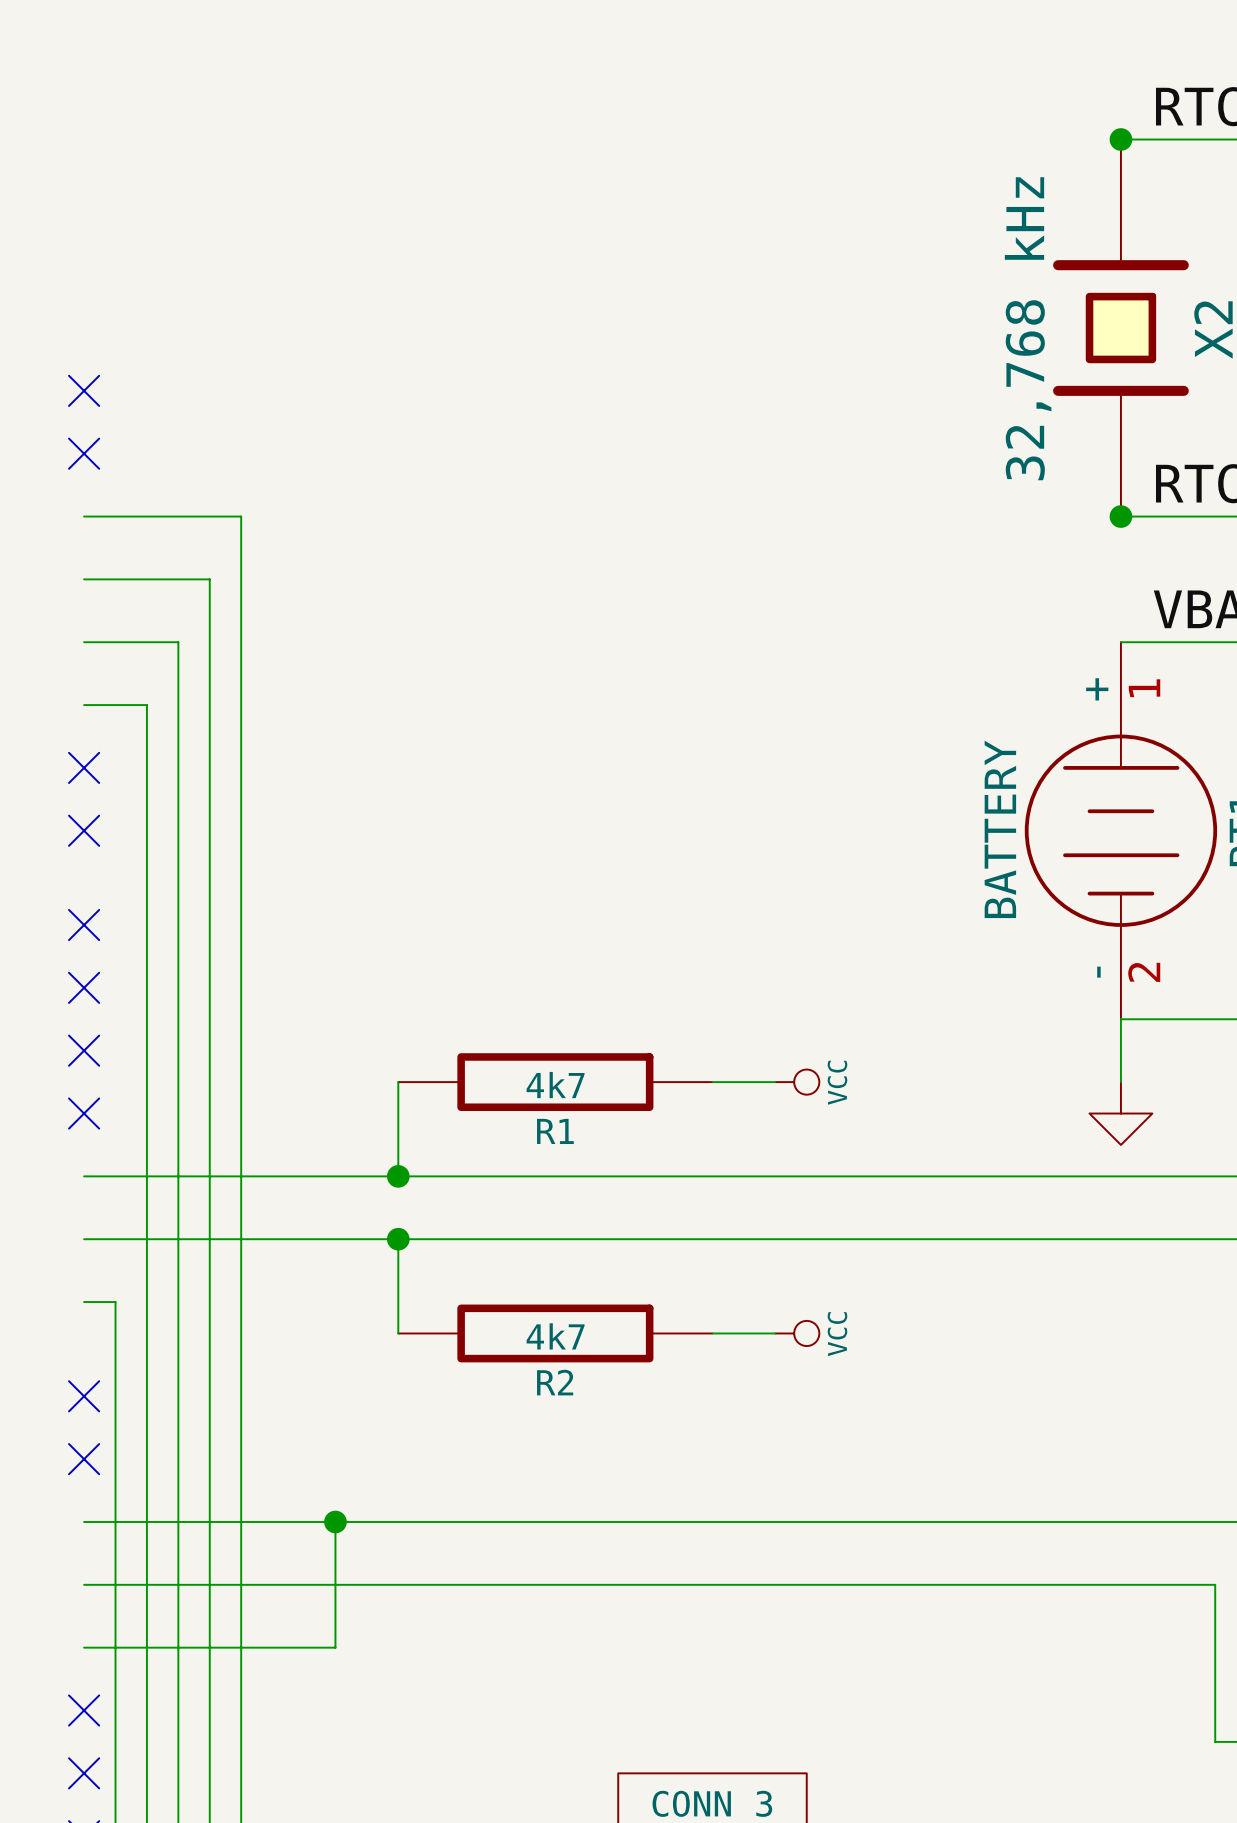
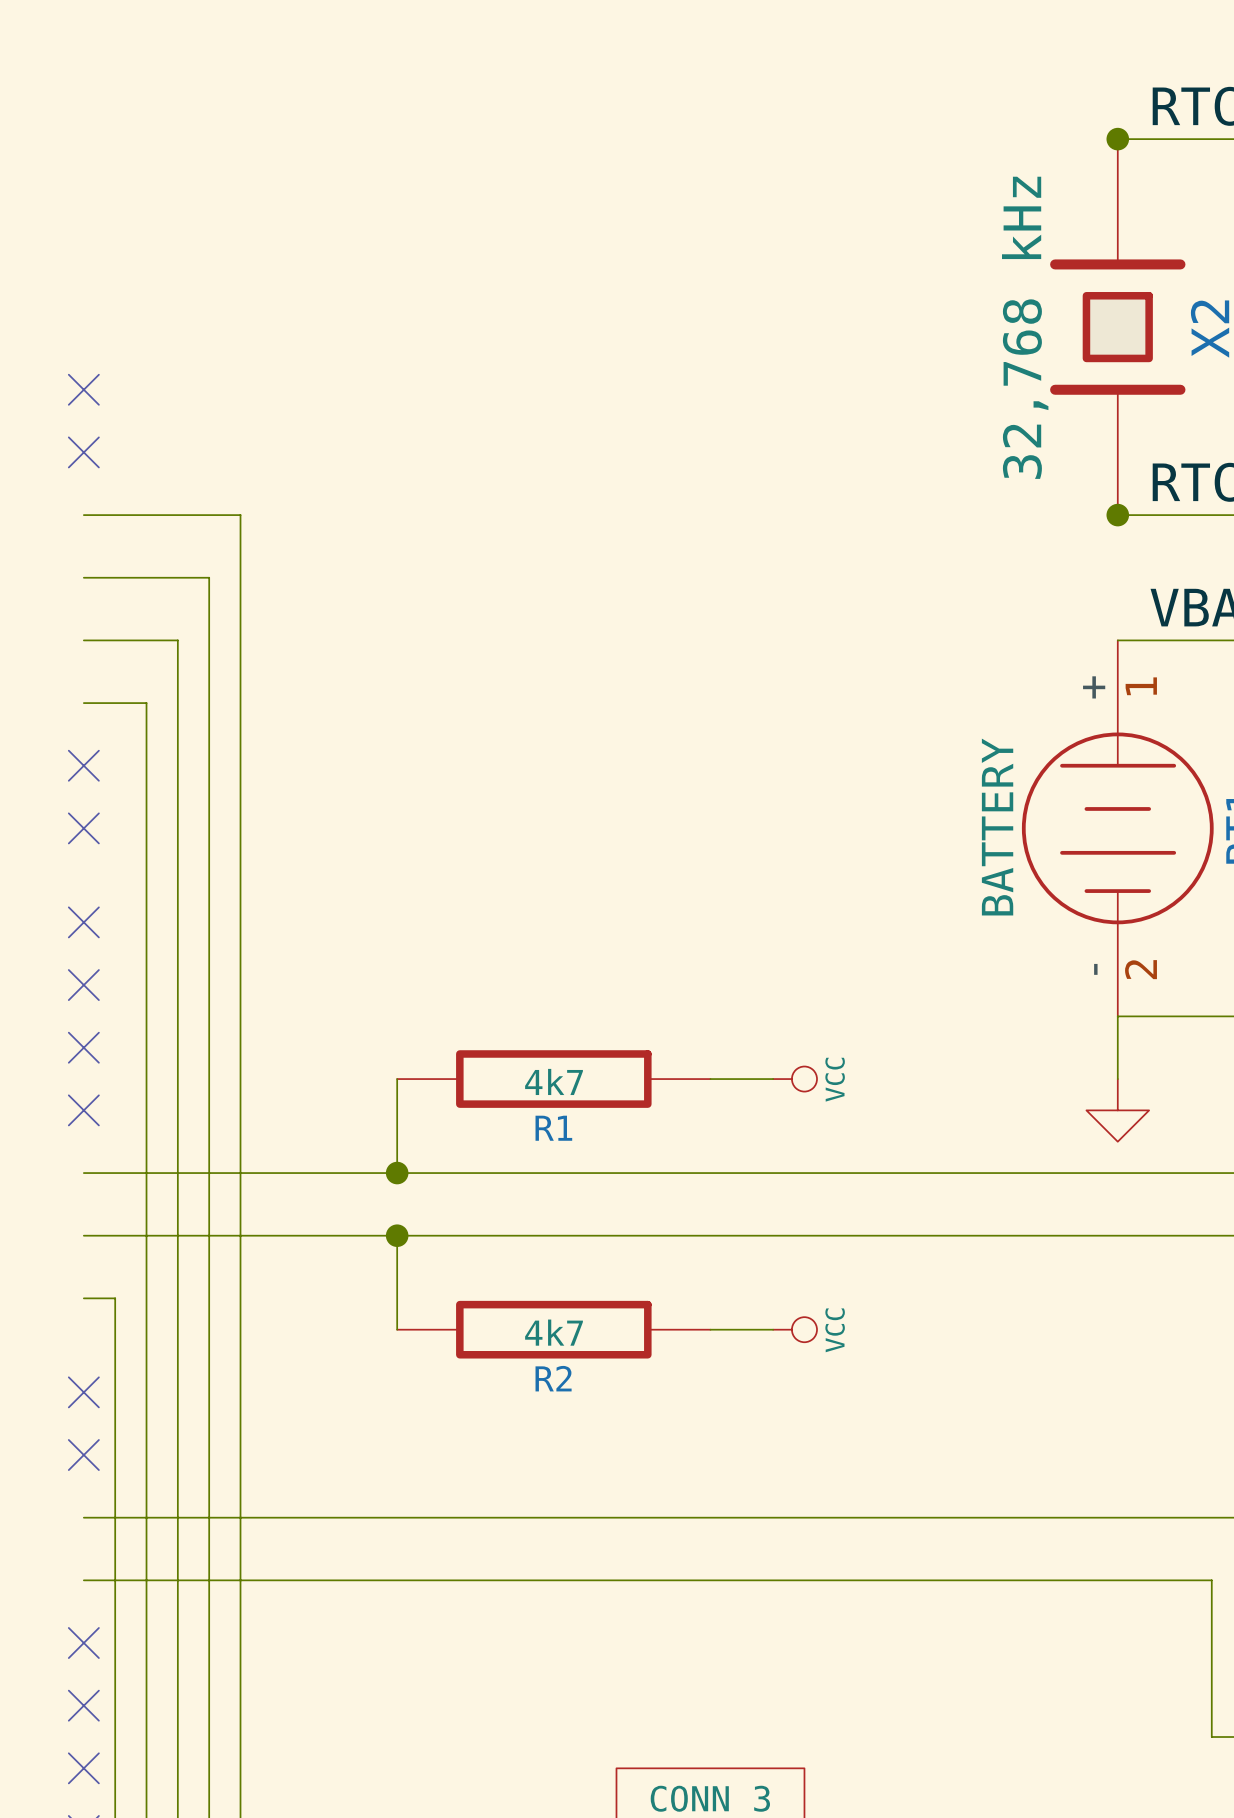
wire: (335, 1521) (335, 1647) (84, 1647) -> none
junction: (335, 1521) -> none
no-connect mark: none -> (83, 1643)

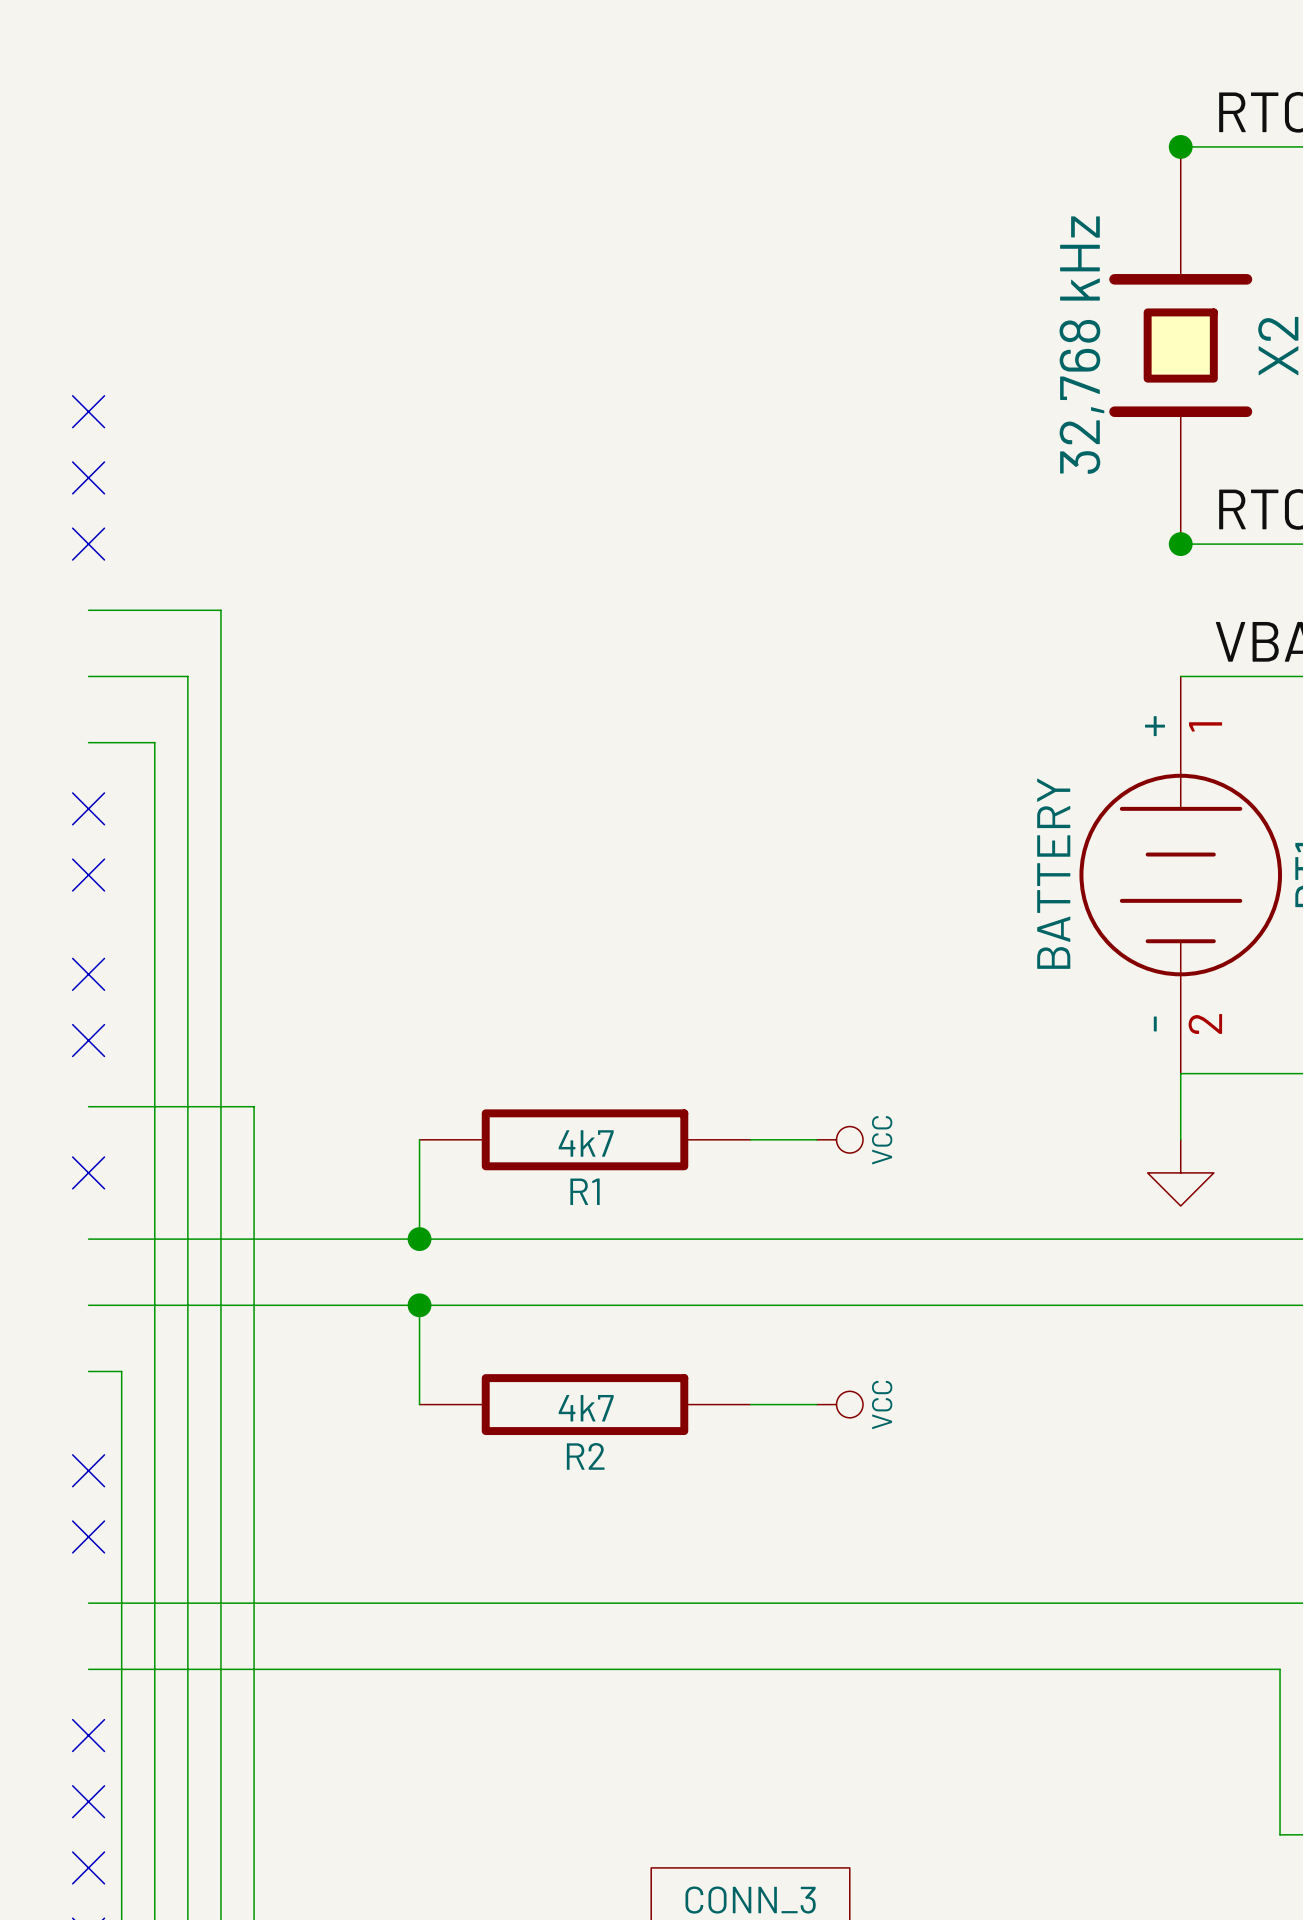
wire: (83, 515) (240, 515) (240, 1047) -> (88, 1106) (254, 1106)
no-connect mark: none -> (88, 544)
no-connect mark: (83, 1047) -> none

